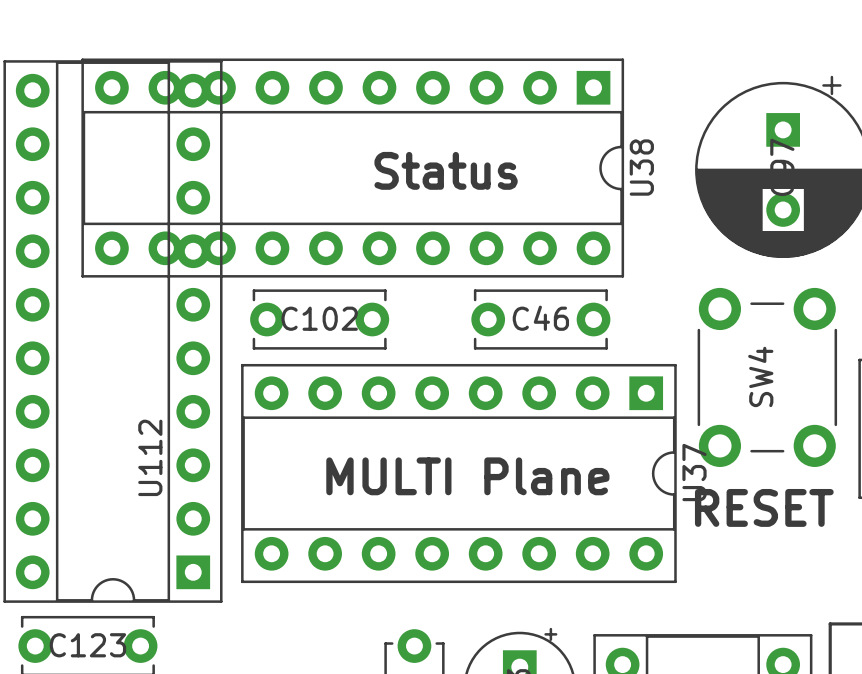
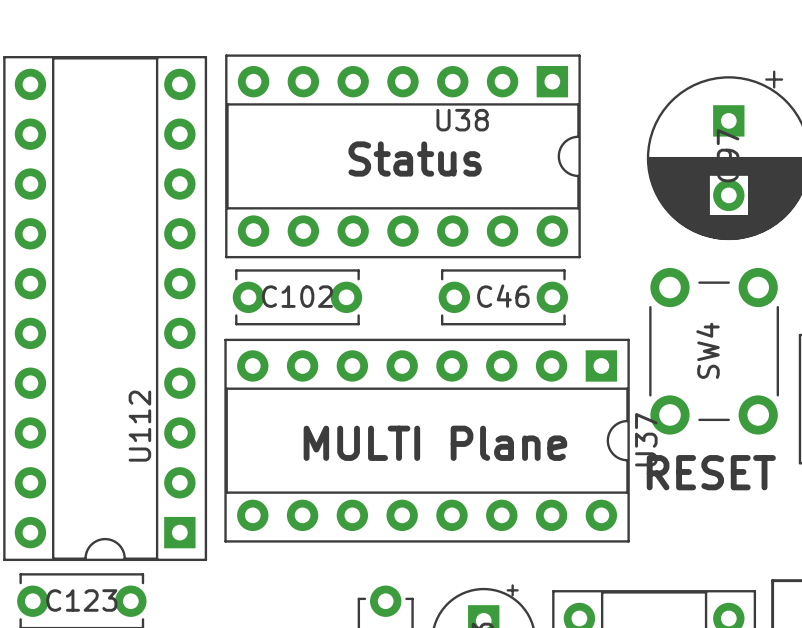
U38 footprint: [81, 58, 625, 278] -> [225, 54, 581, 259]
U38 name position: U38 (641, 167) -> U38 (462, 120)

